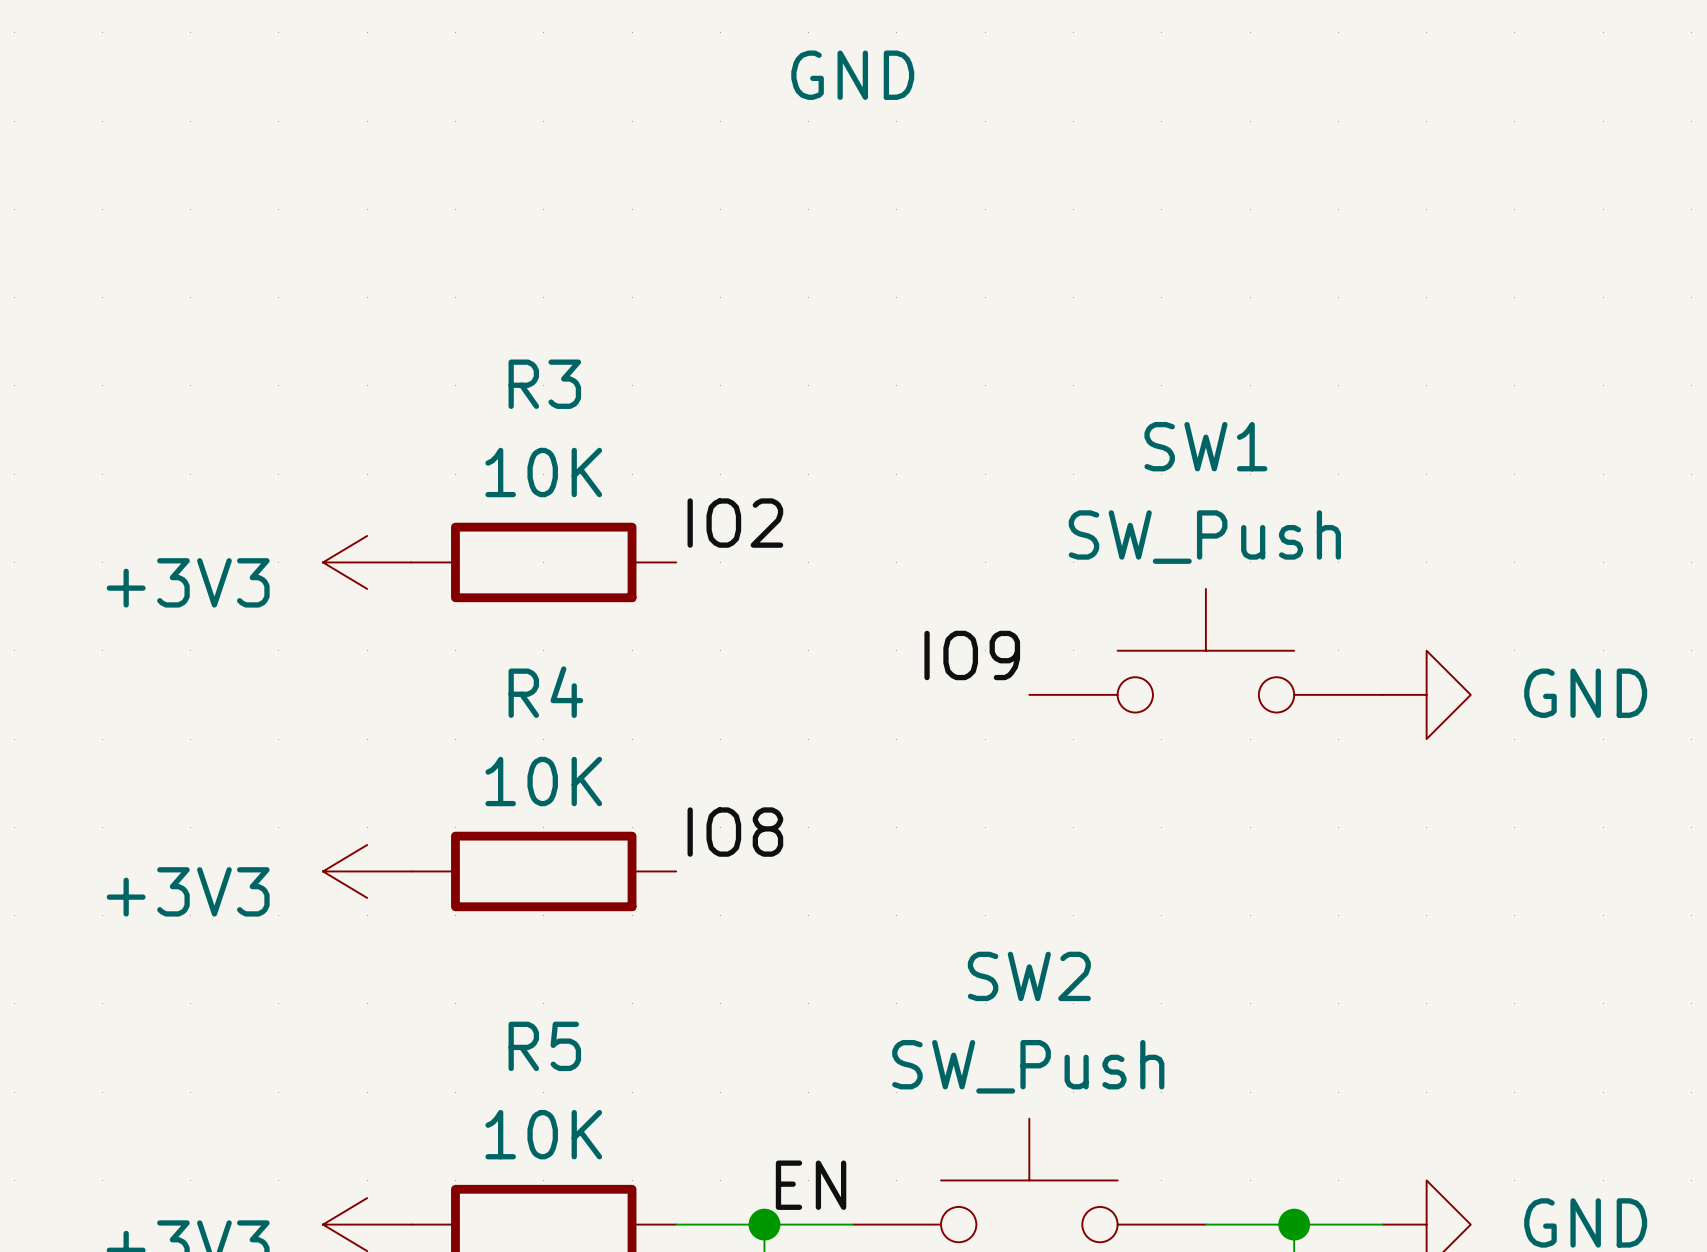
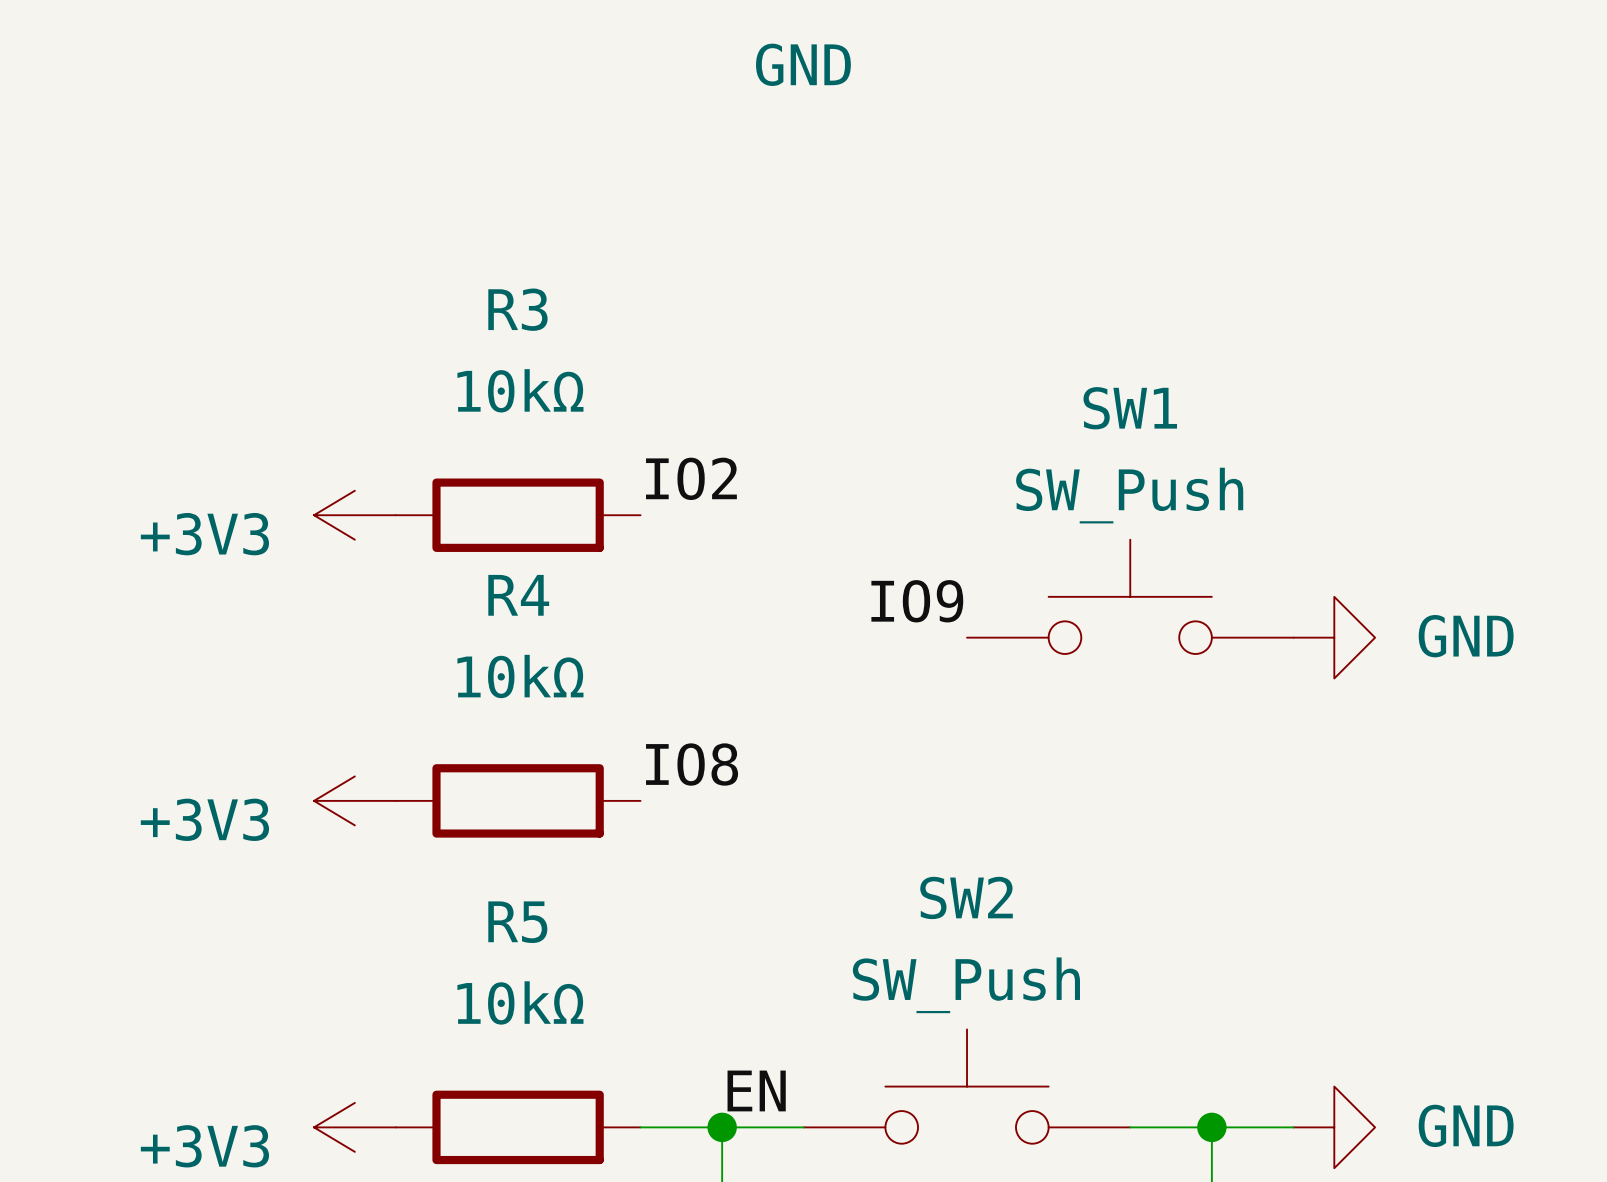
R3 name position: R3 (544, 384) -> R3 (517, 309)
R3 value: 10K (543, 472) -> 10kΩ (520, 390)
R4 name position: R4 (545, 692) -> R4 (518, 595)
R4 value: 10K (543, 781) -> 10kΩ (520, 676)
R5 name position: R5 (544, 1046) -> R5 (517, 922)
R5 value: 10K (543, 1134) -> 10kΩ (520, 1002)

